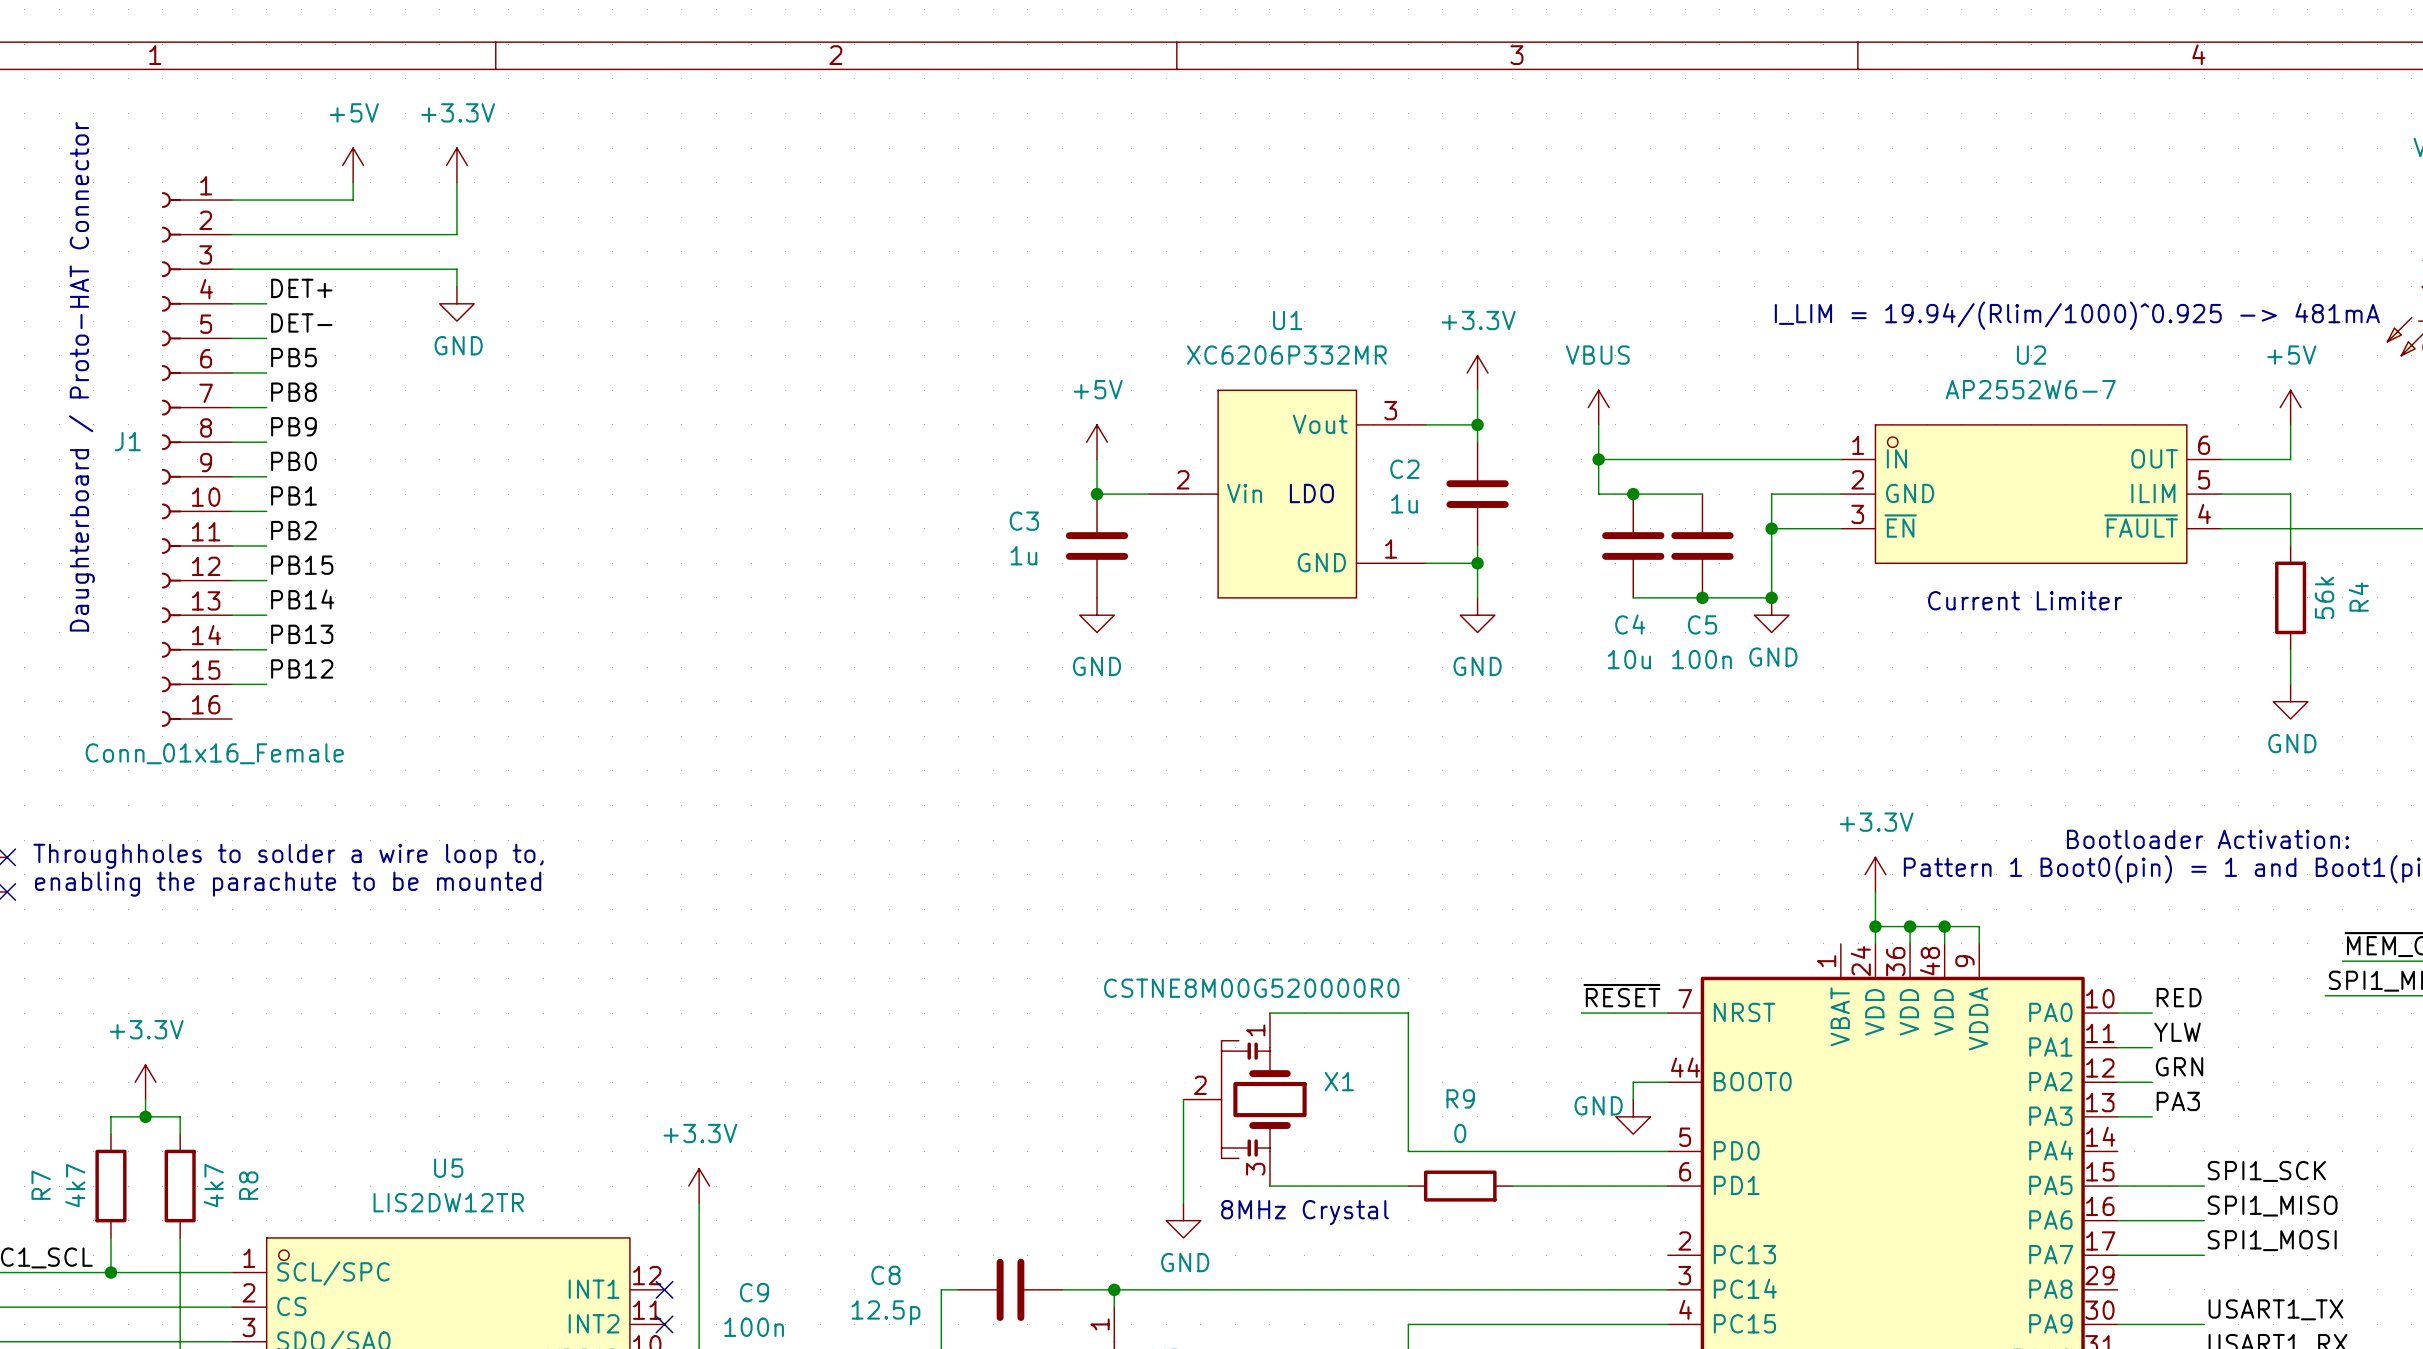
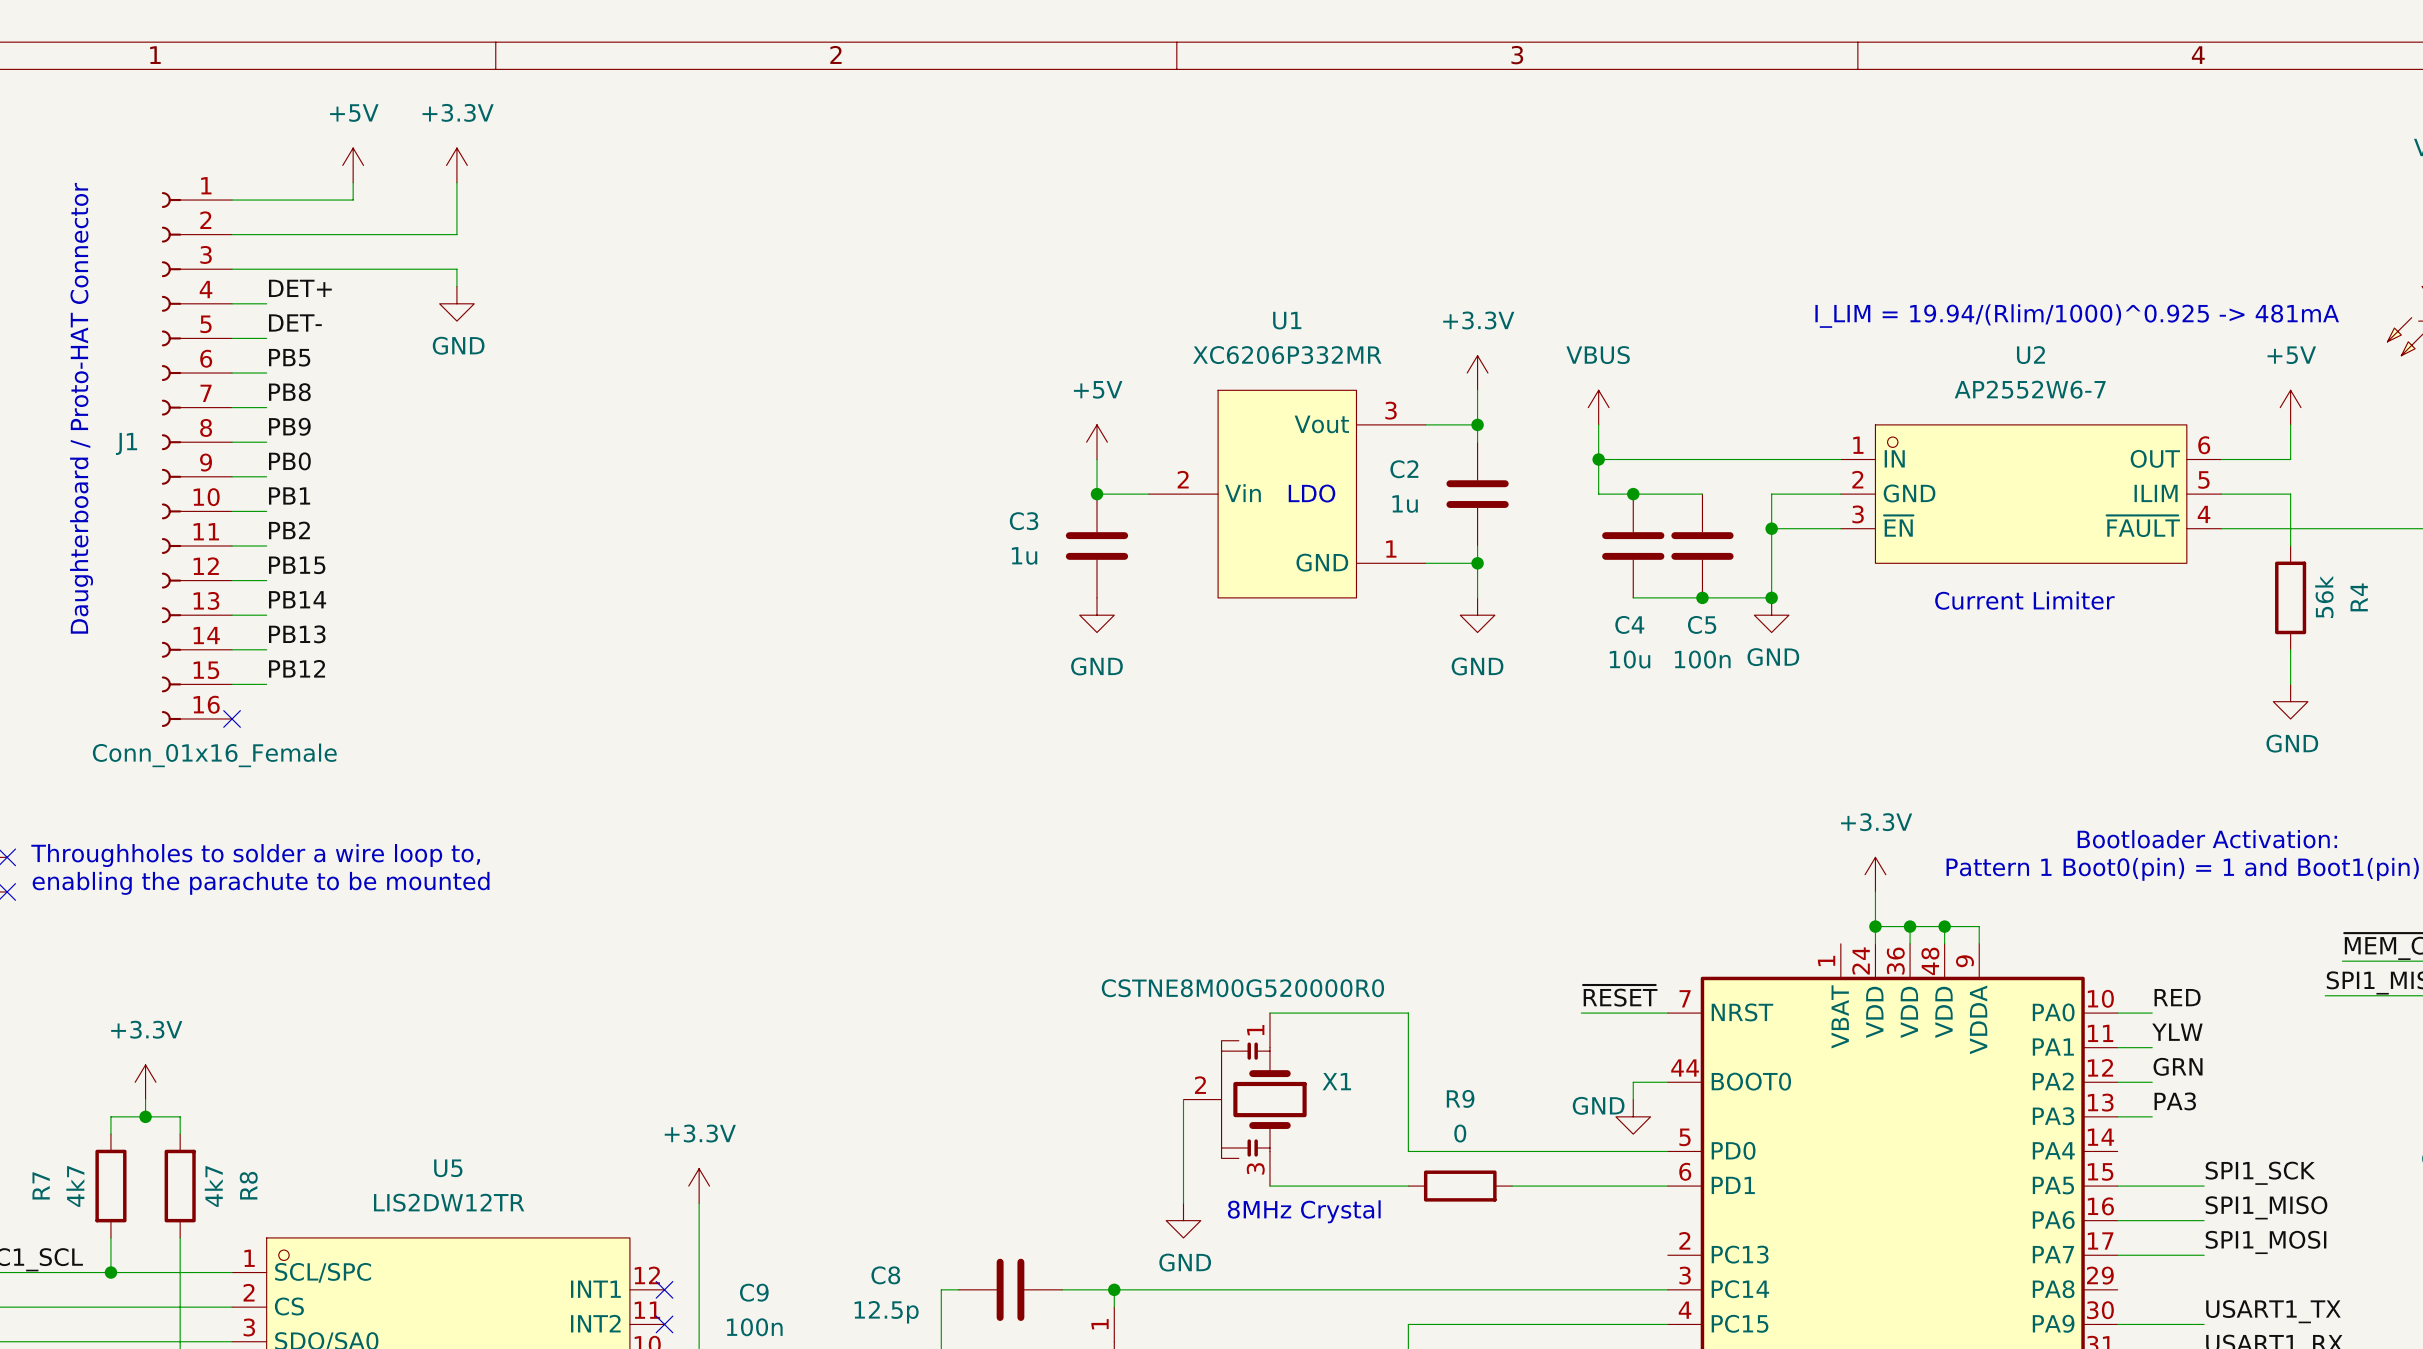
no-connect mark: none -> (232, 718)

